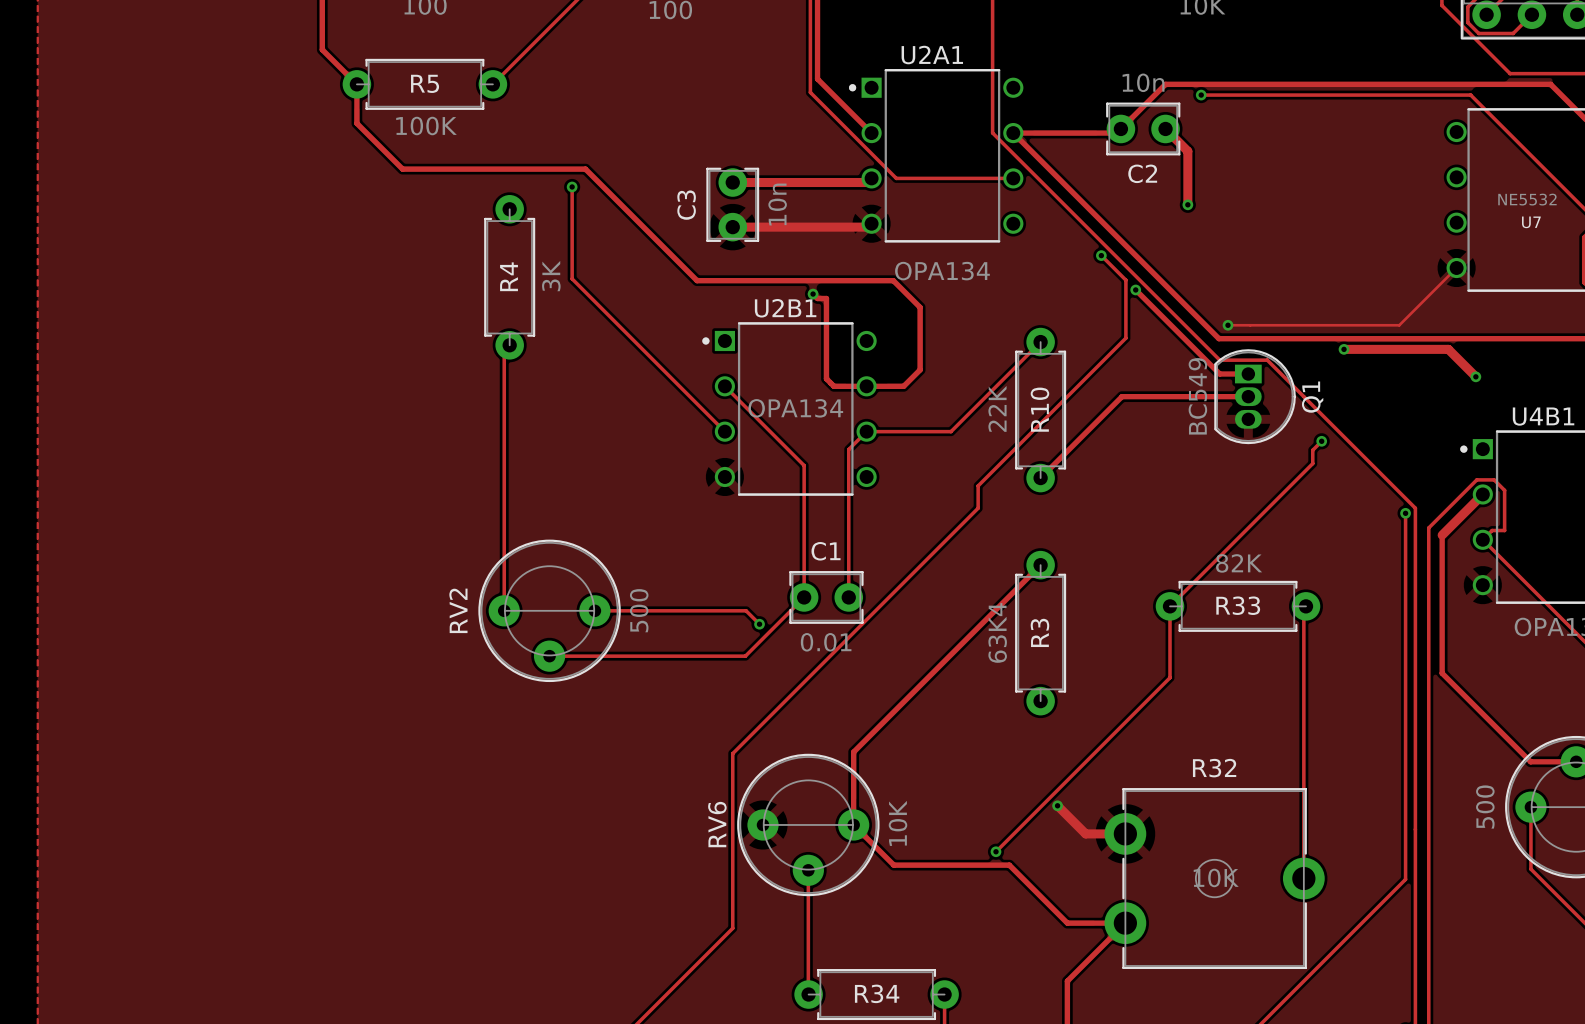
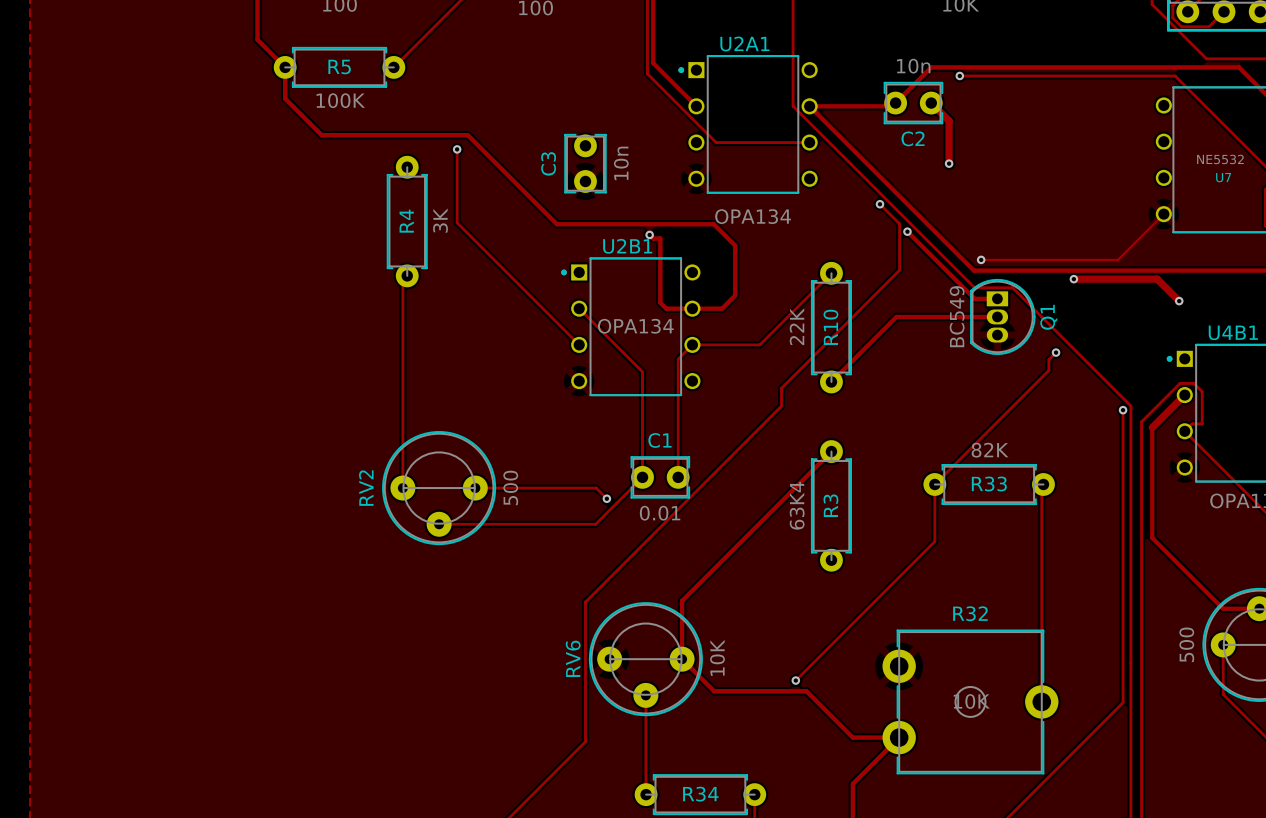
track: (871, 178) (867, 182) (732, 182) -> none
track: (871, 223) (868, 227) (732, 227) -> none
track: (1057, 805) (1085, 833) (1125, 833) -> none
via: (1057, 805) -> none

